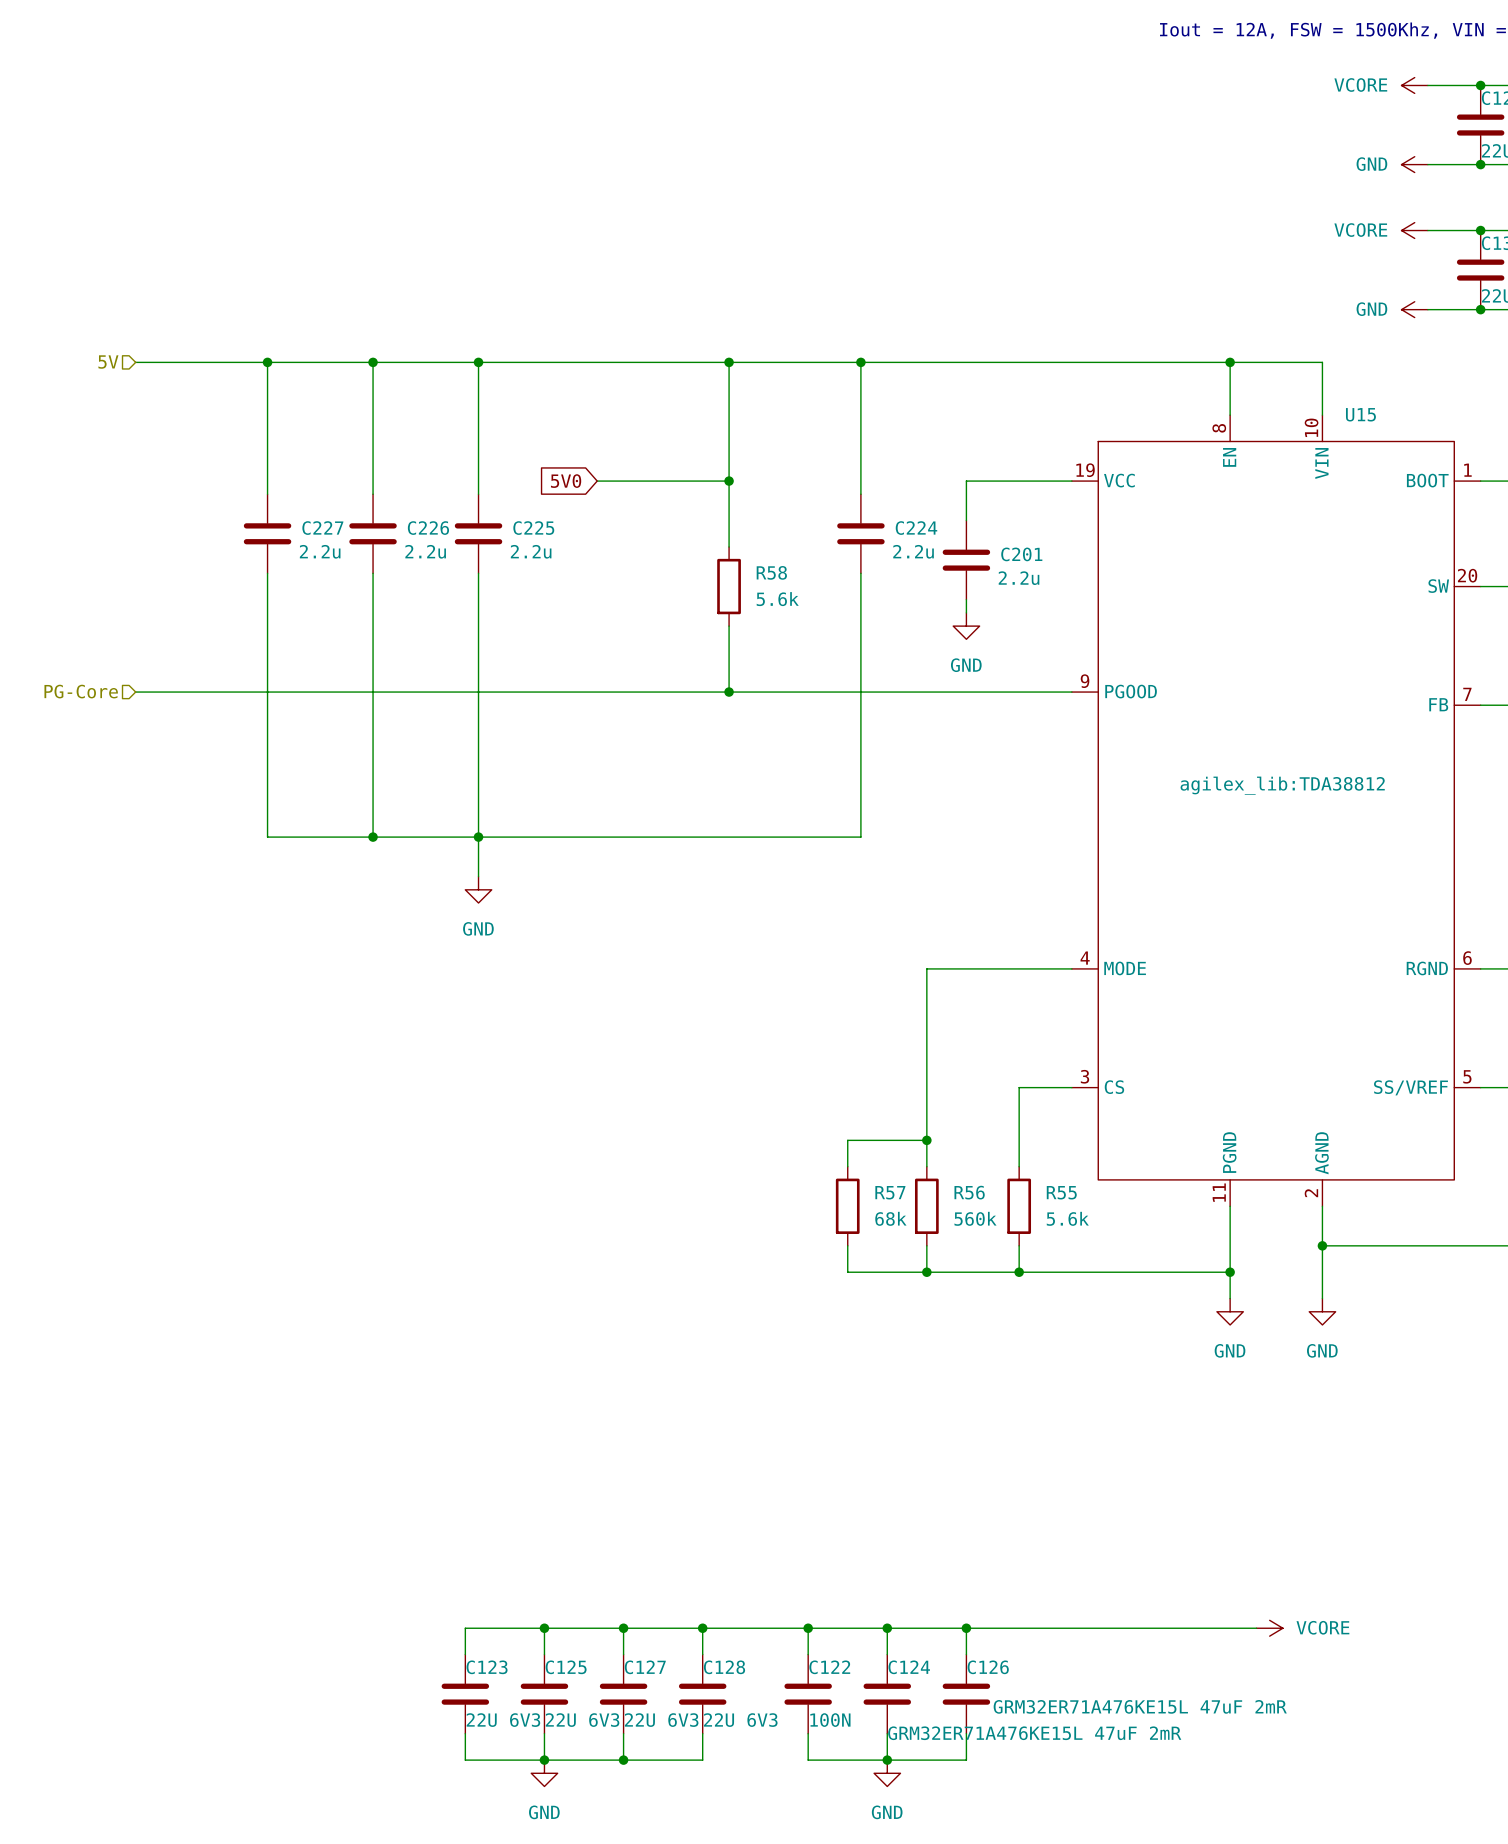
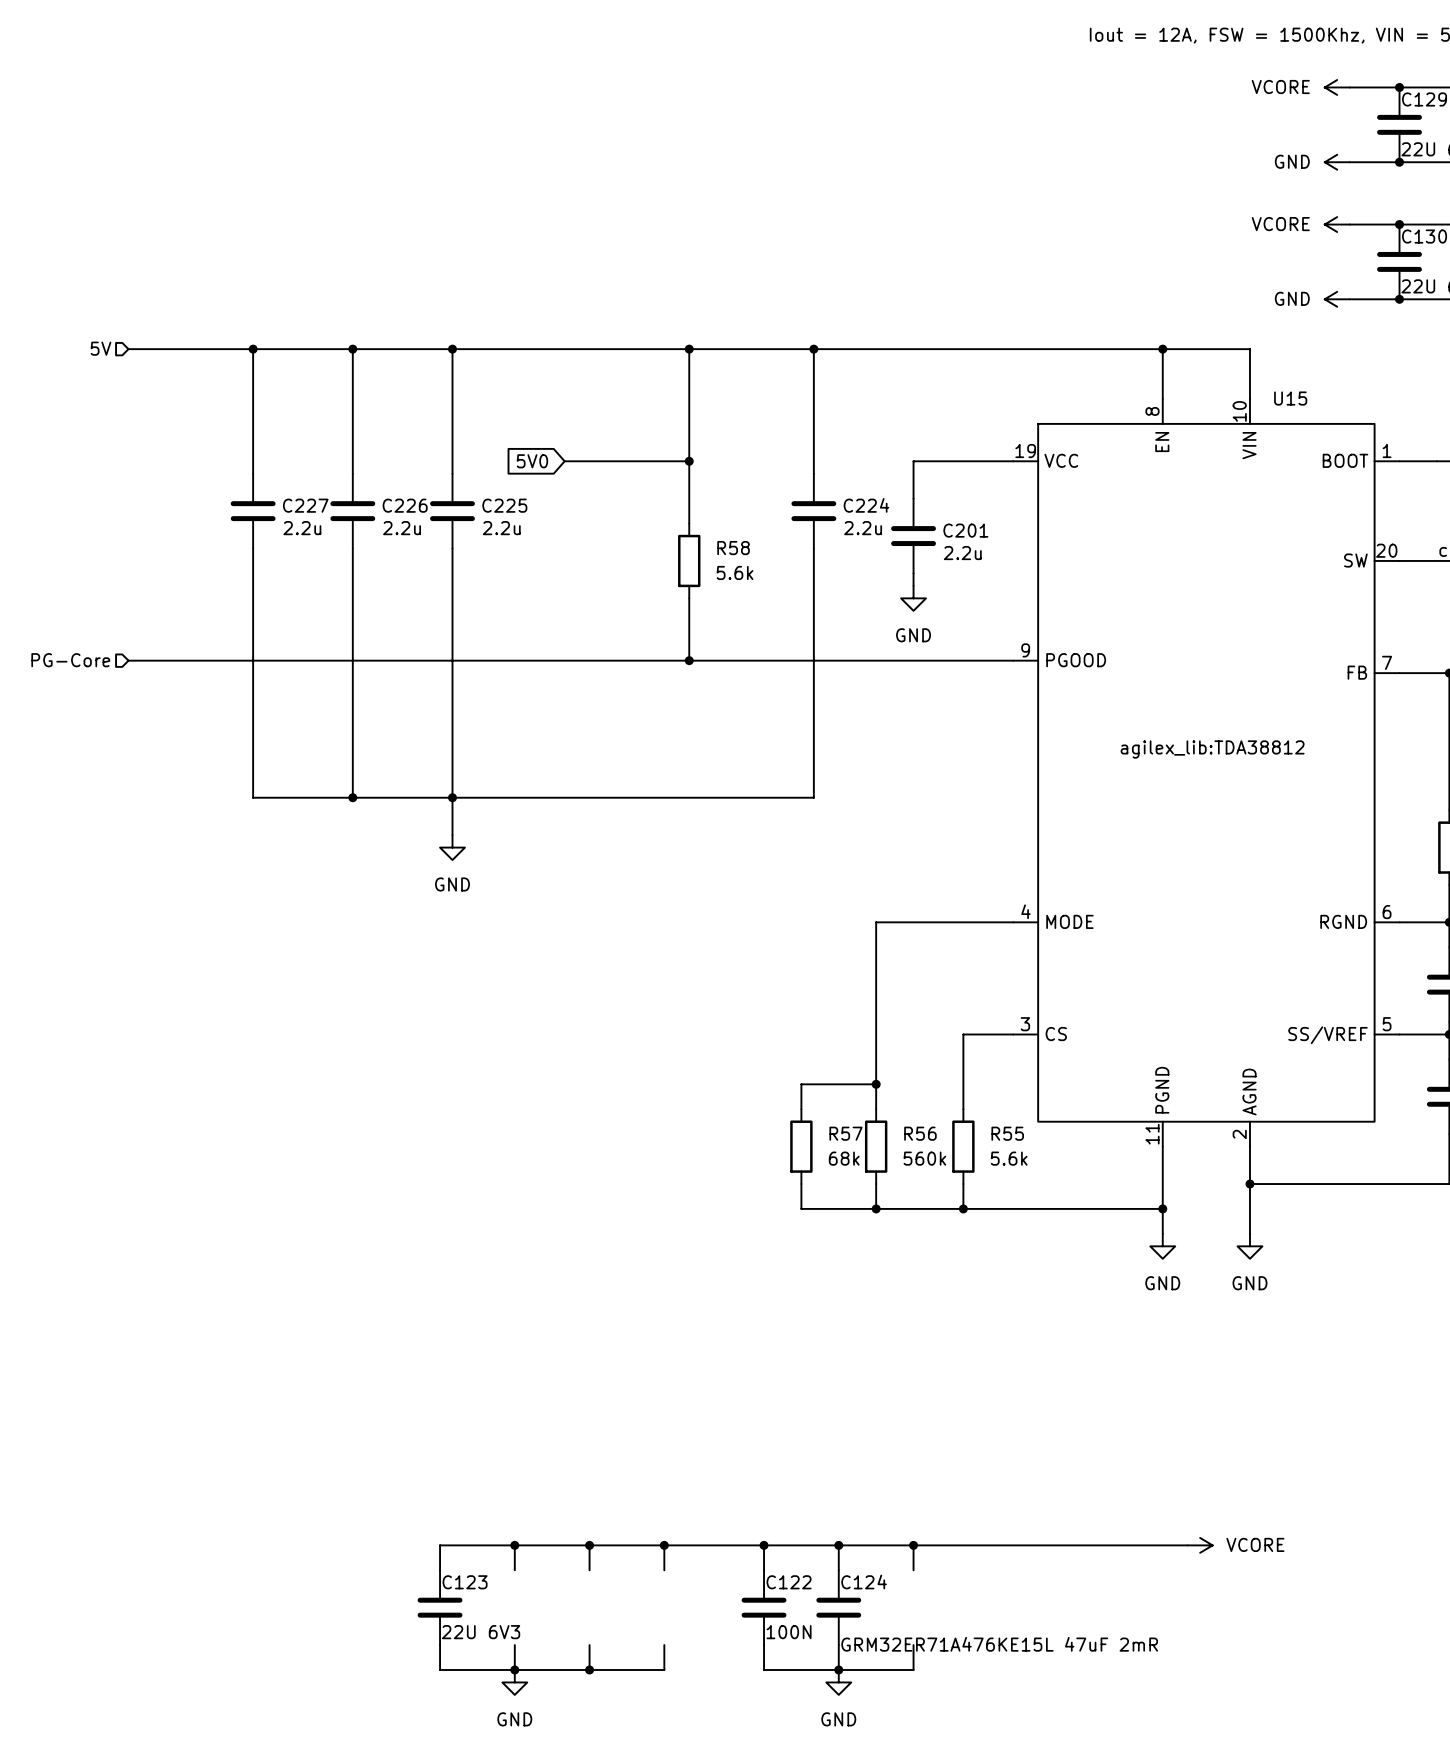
C125: 22U 6V3 (544, 1694) -> none
C127: 22U 6V3 (623, 1694) -> none
C128: 22U 6V3 (702, 1694) -> none
C126: GRM32ER71A476KE15L 47uF 2mR (966, 1694) -> none

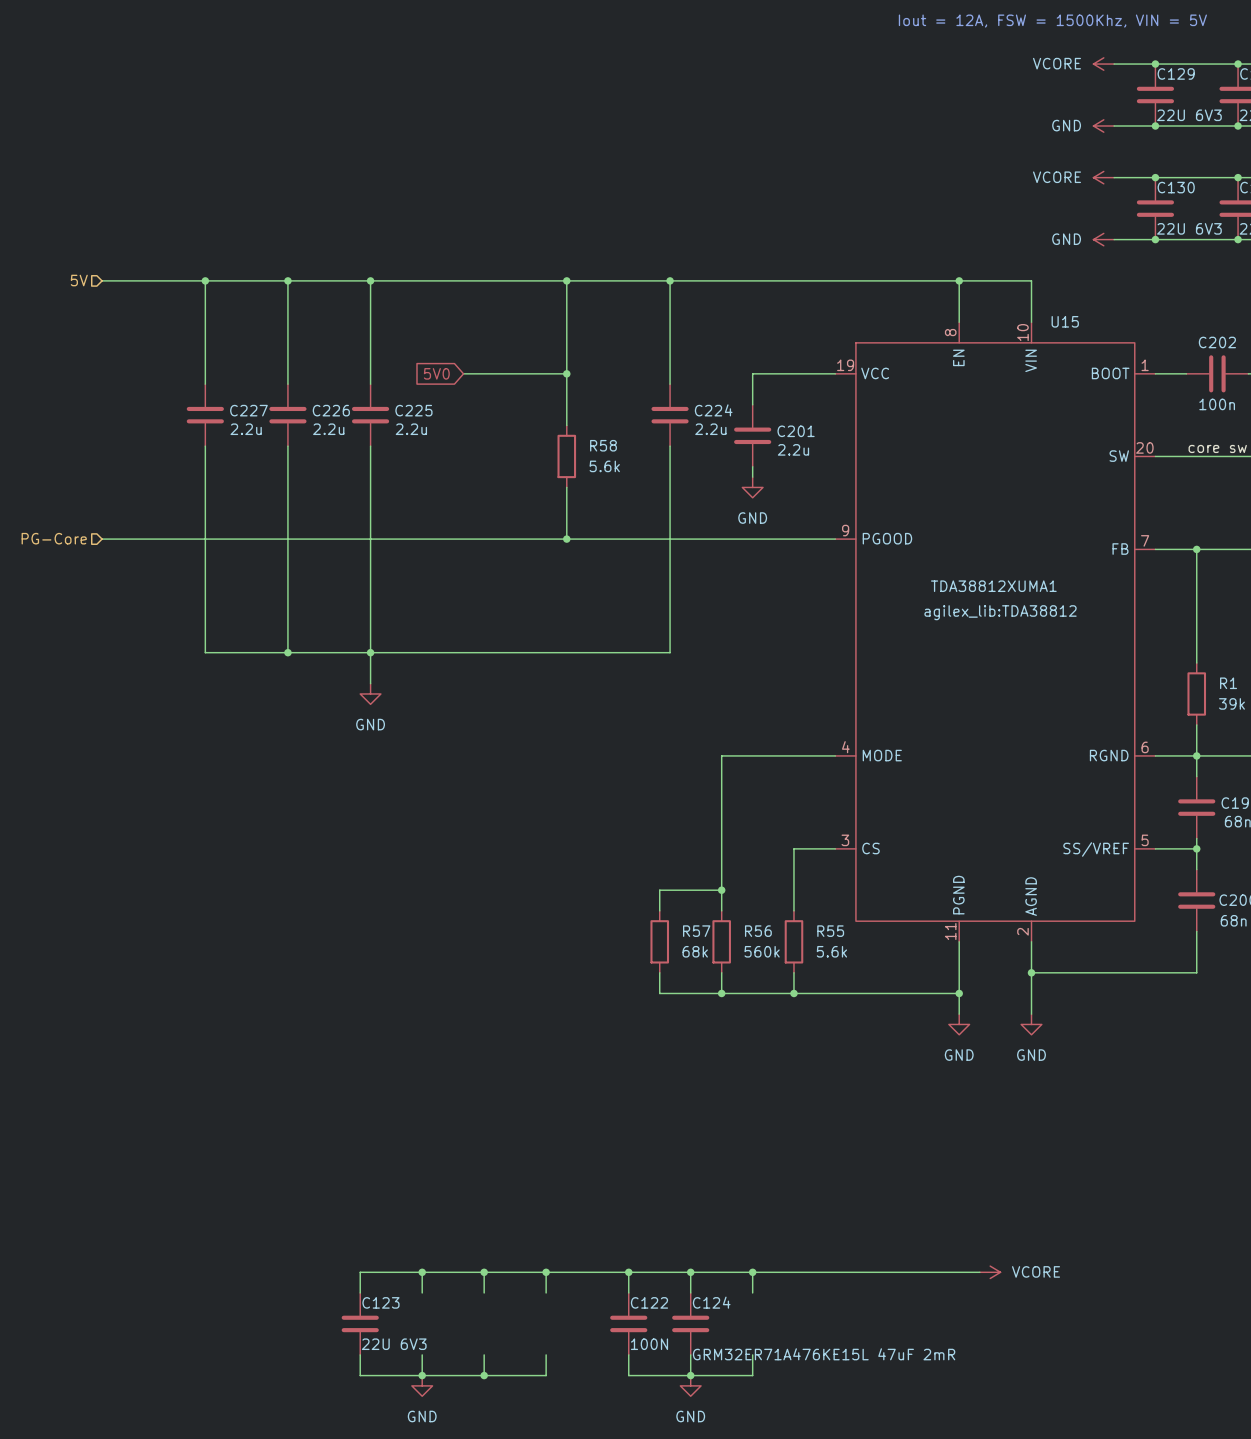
U15 value: none -> TDA38812XUMA1 (993, 586)

